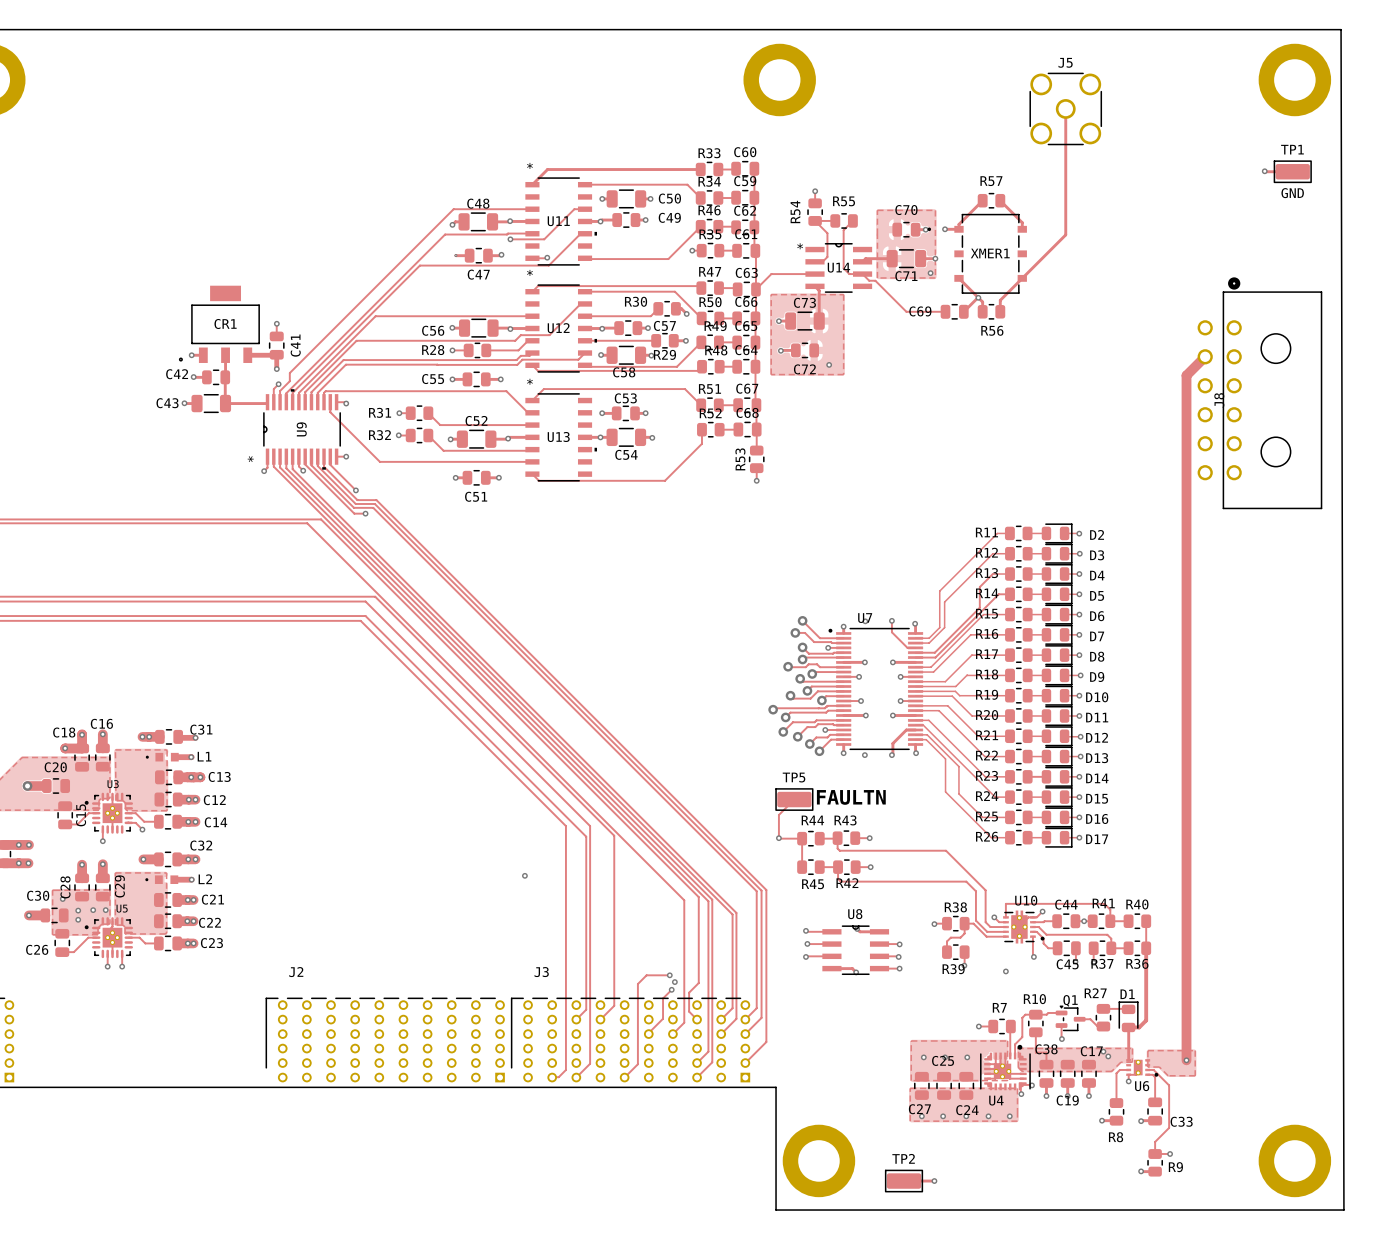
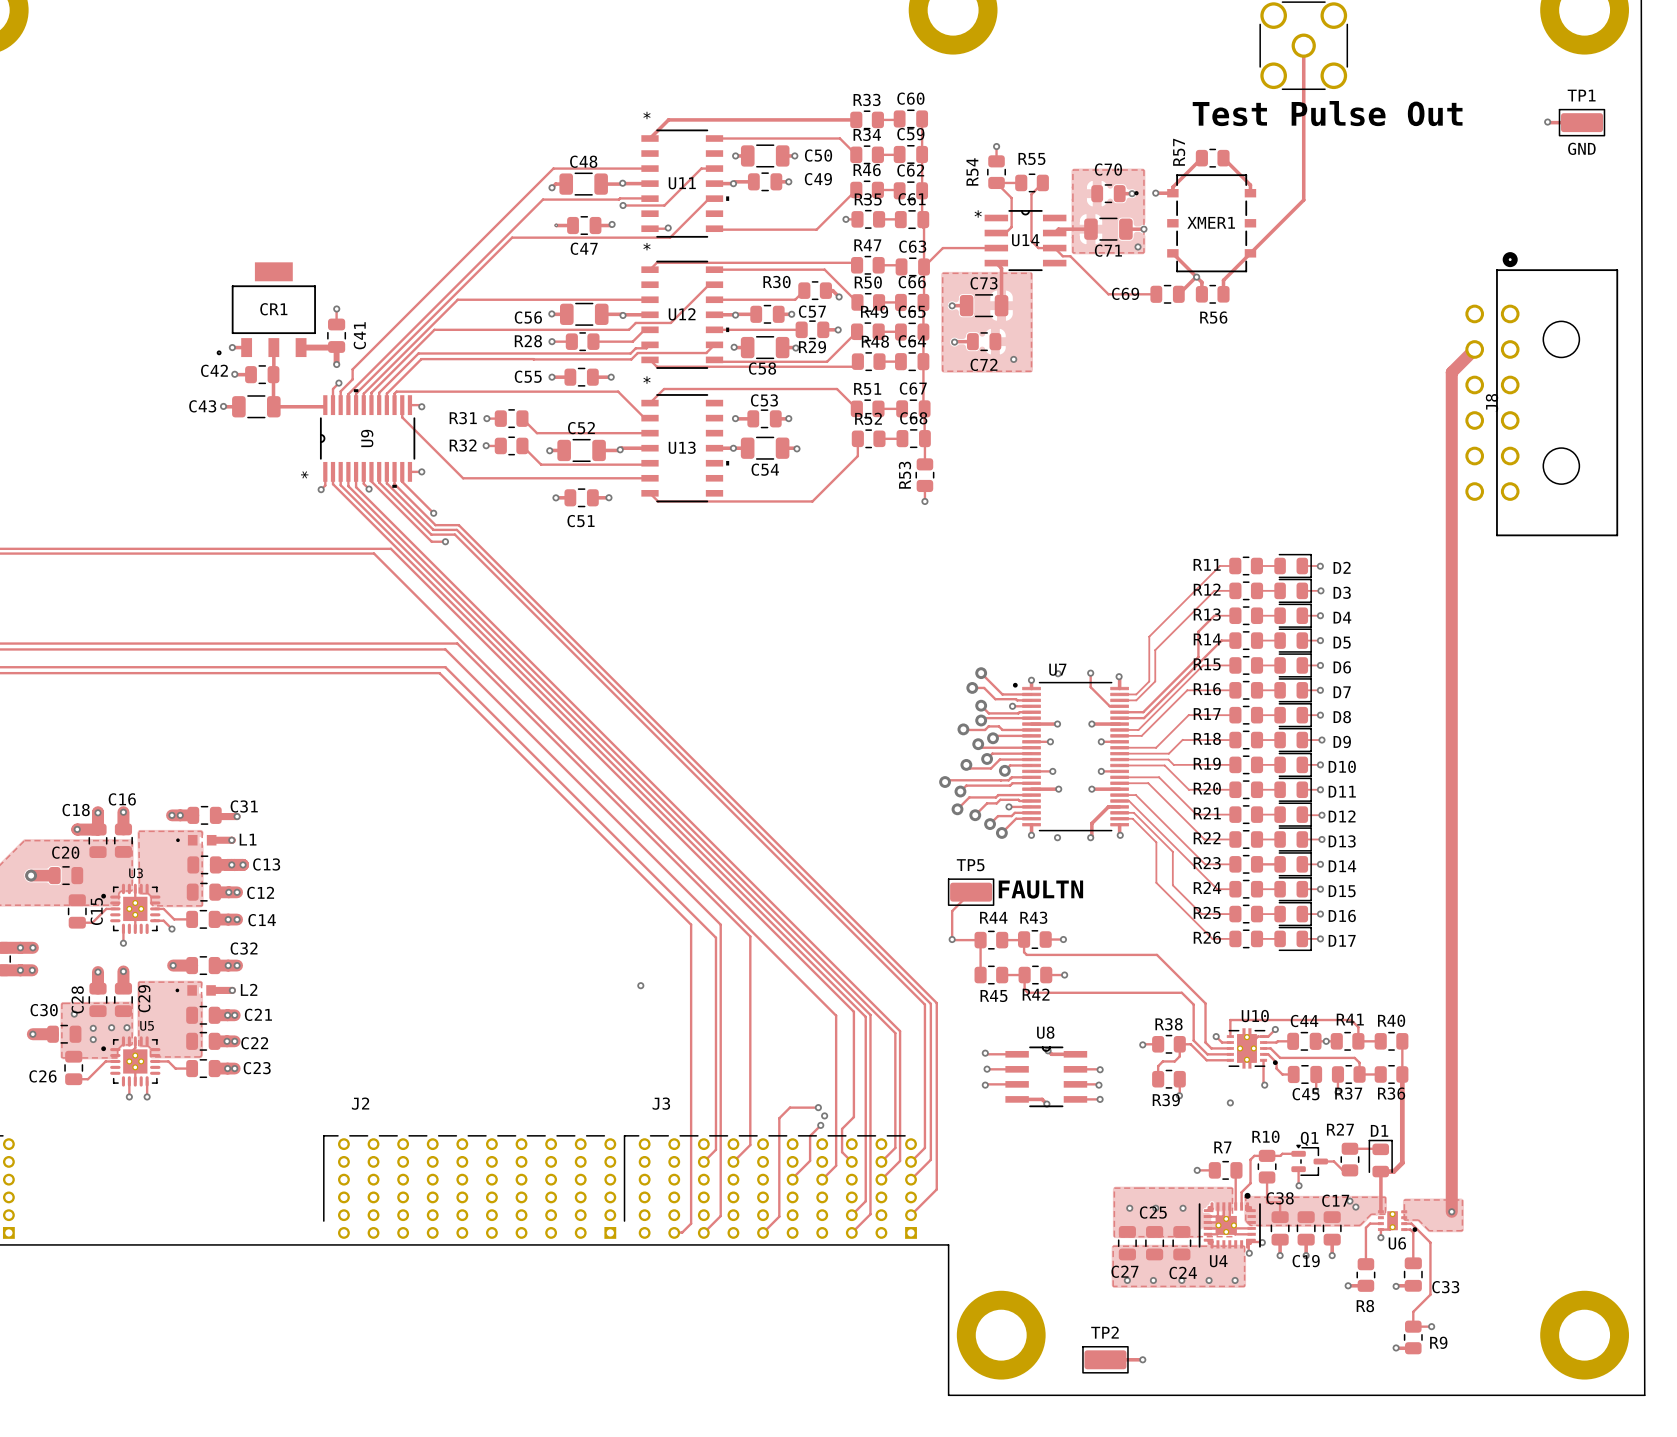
text: none -> Test Pulse Out (1327, 113)
R57 name rotation: 0° (991, 181) -> 90° counterclockwise (1179, 152)

